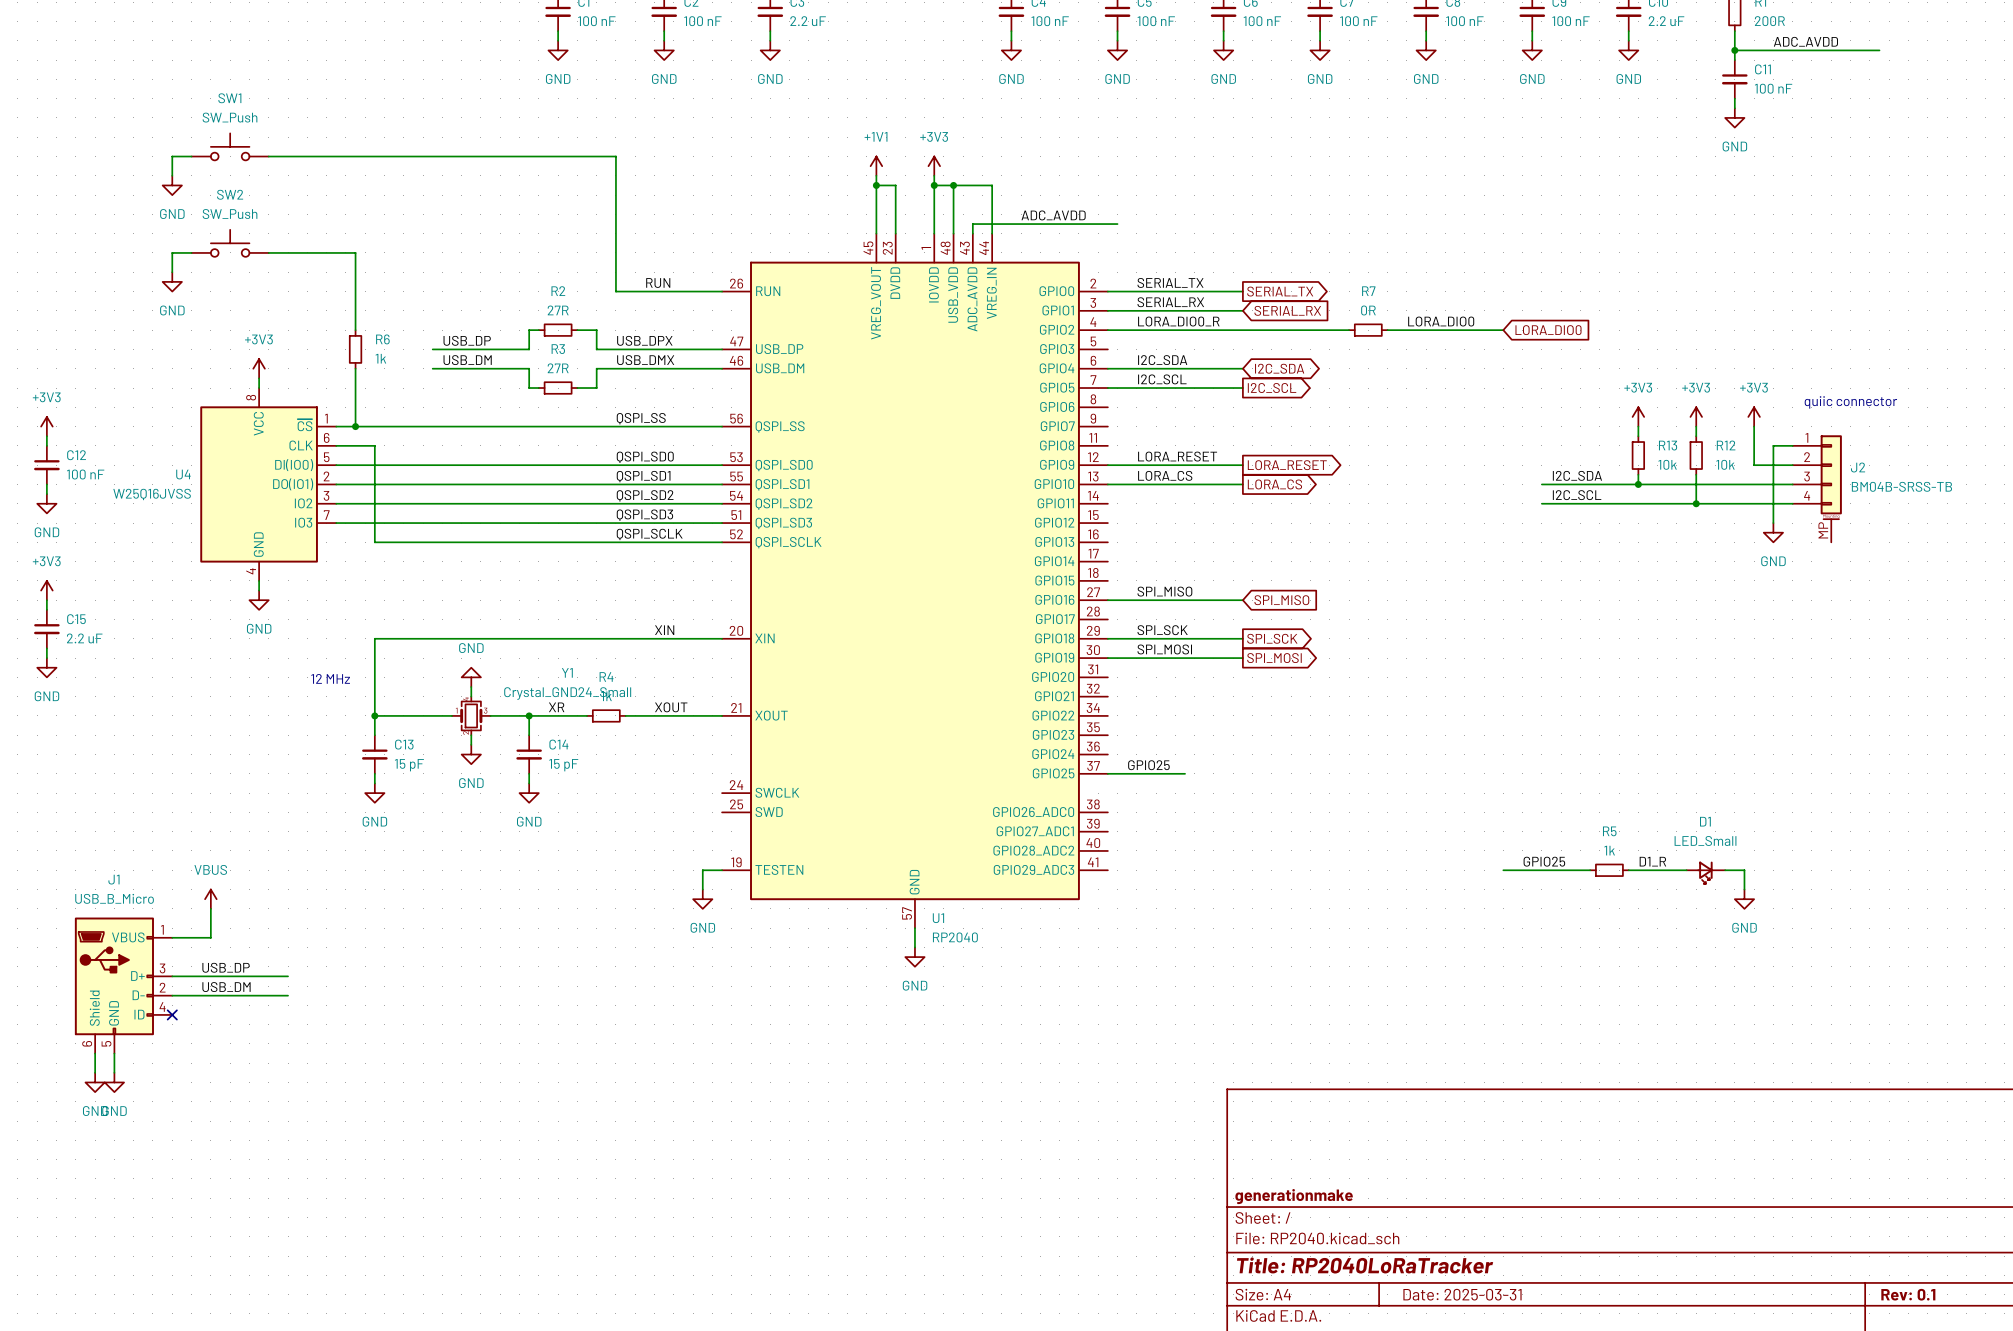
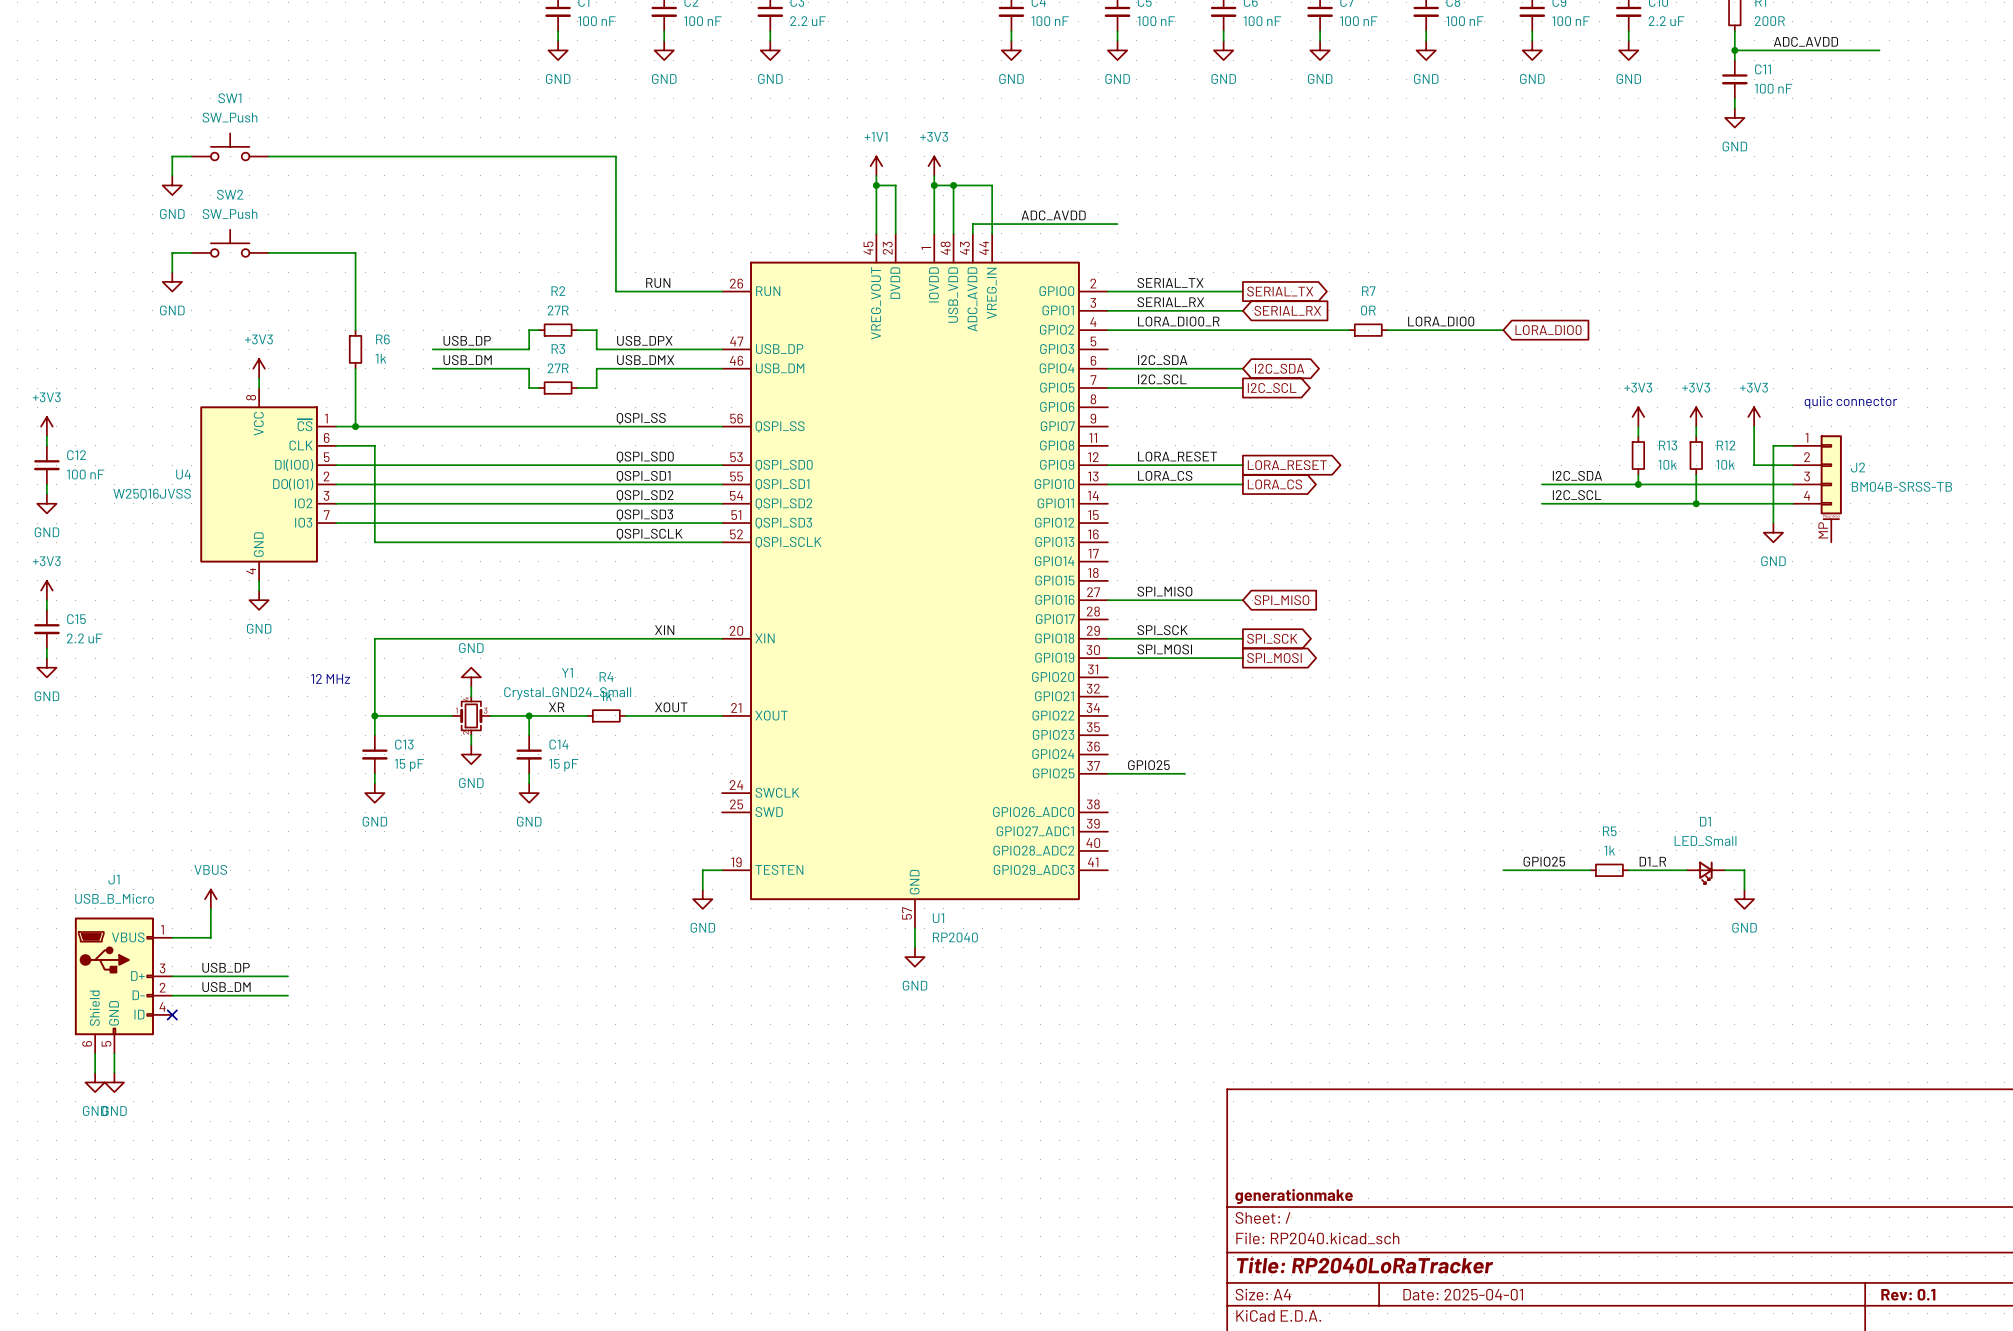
title block: Date: 2025-03-31 (1462, 1294) -> Date: 2025-04-01 (1463, 1294)

